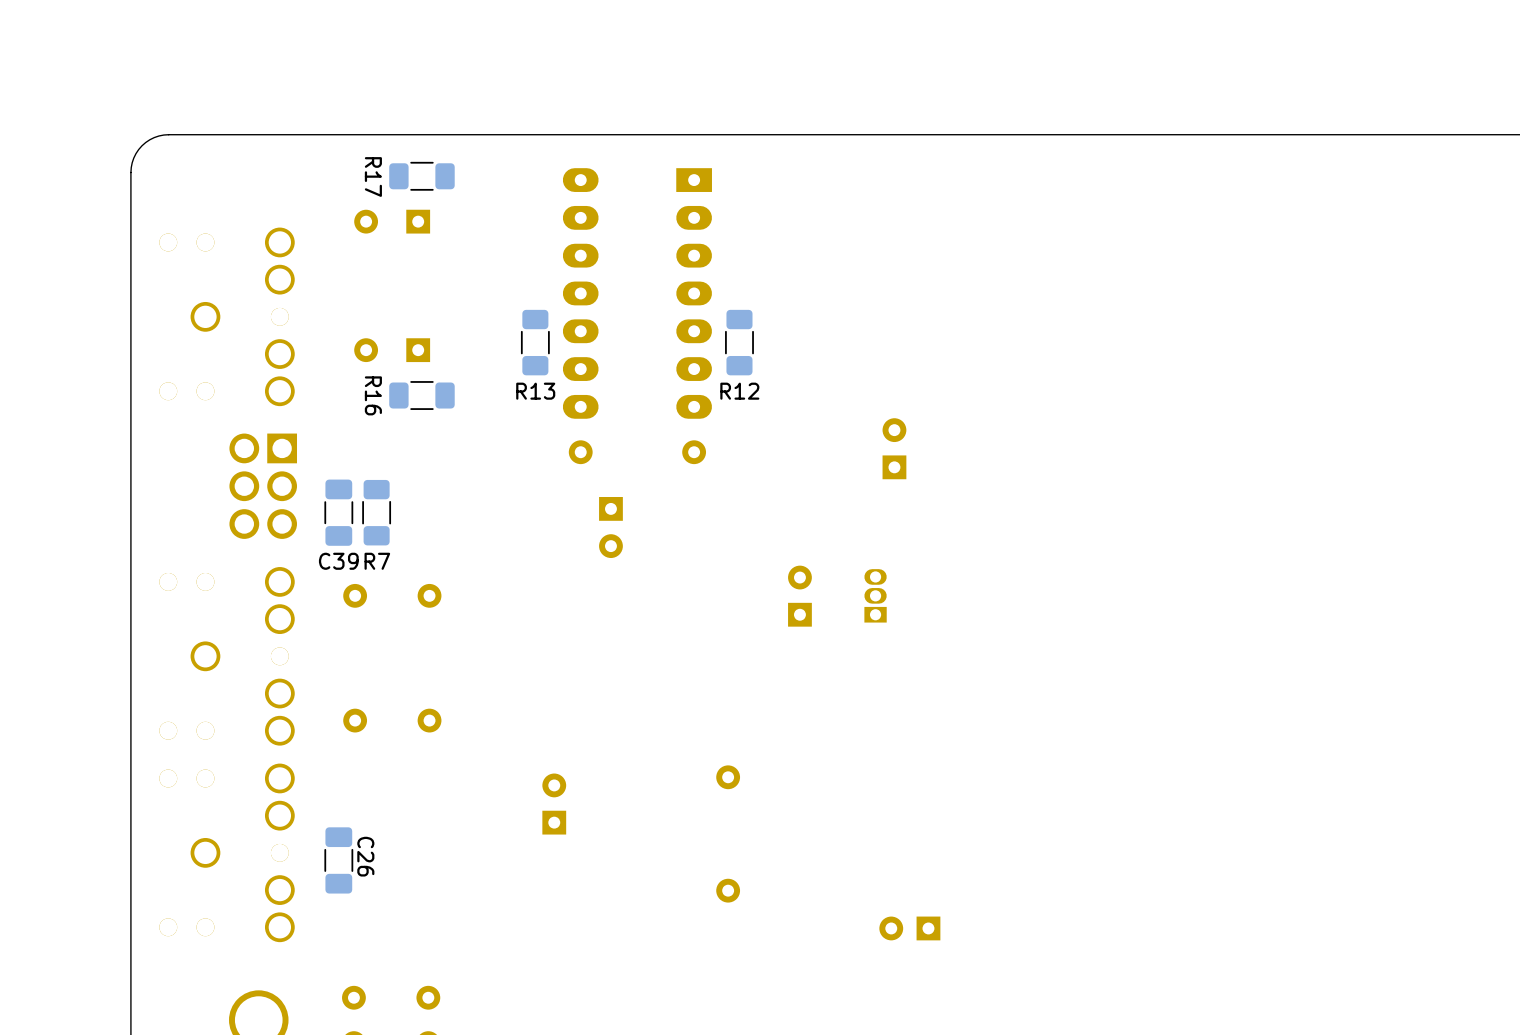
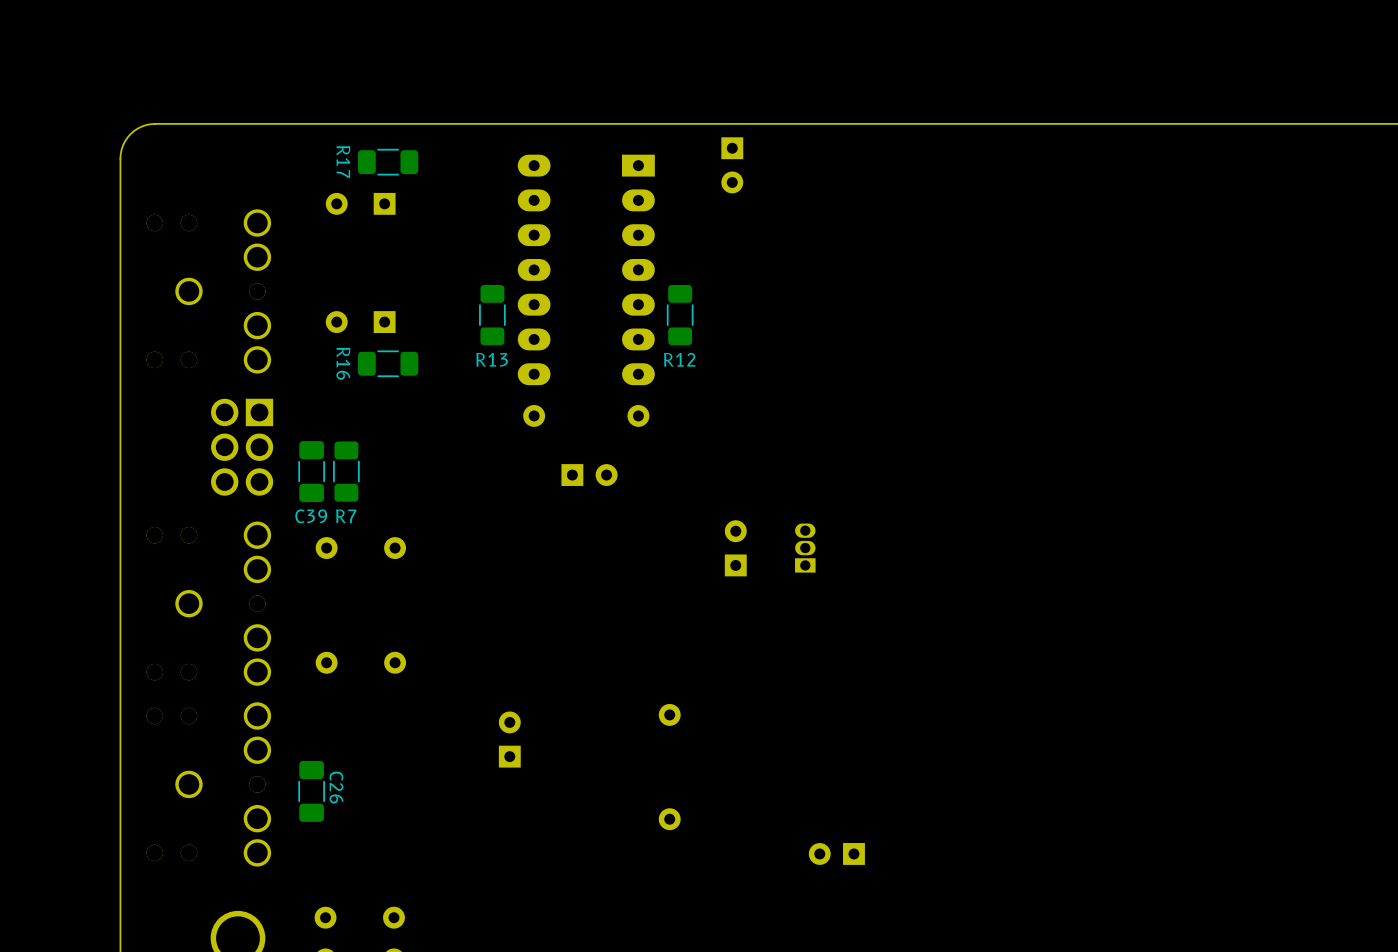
part: none -> (732, 165)
part: (894, 448) -> none
part rotation: 0° (610, 527) -> 90° counterclockwise (589, 475)

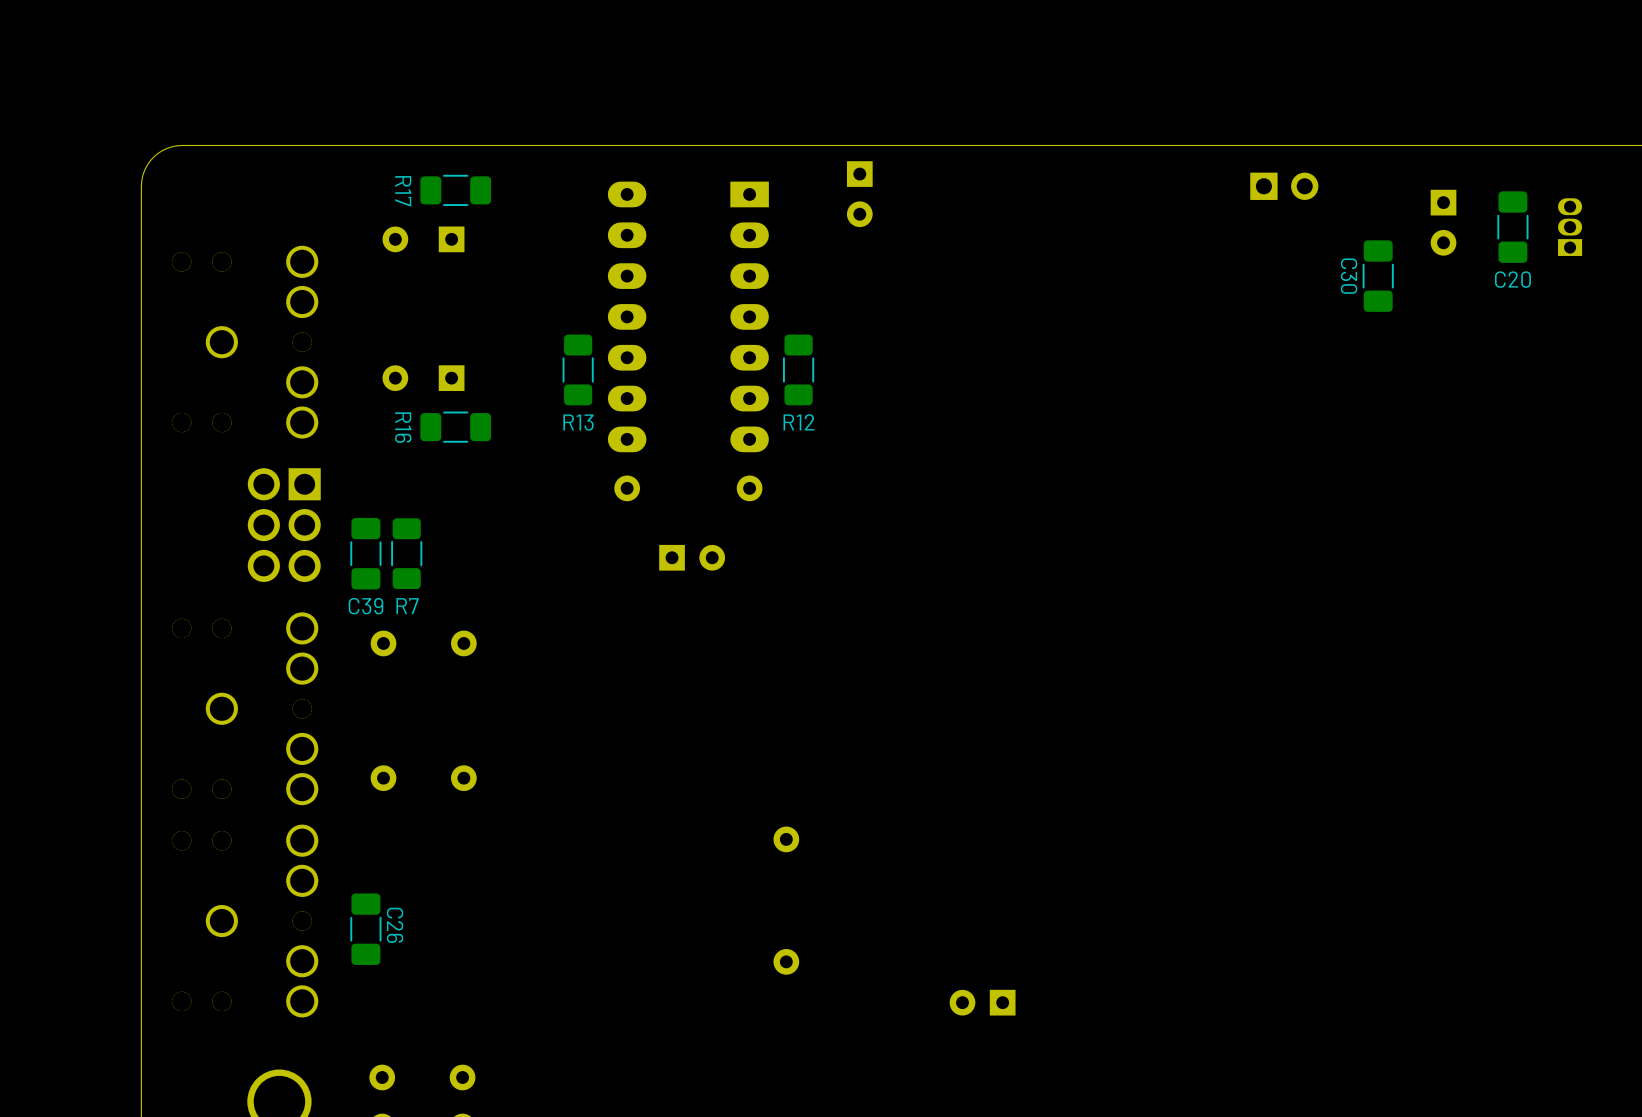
part: none -> (1284, 186)
part: none -> (1443, 222)
C20: none -> (1512, 227)
part: none -> (1570, 227)
C30: none -> (1378, 276)
part: (735, 548) -> none
part: (805, 548) -> none
part: (509, 739) -> none

